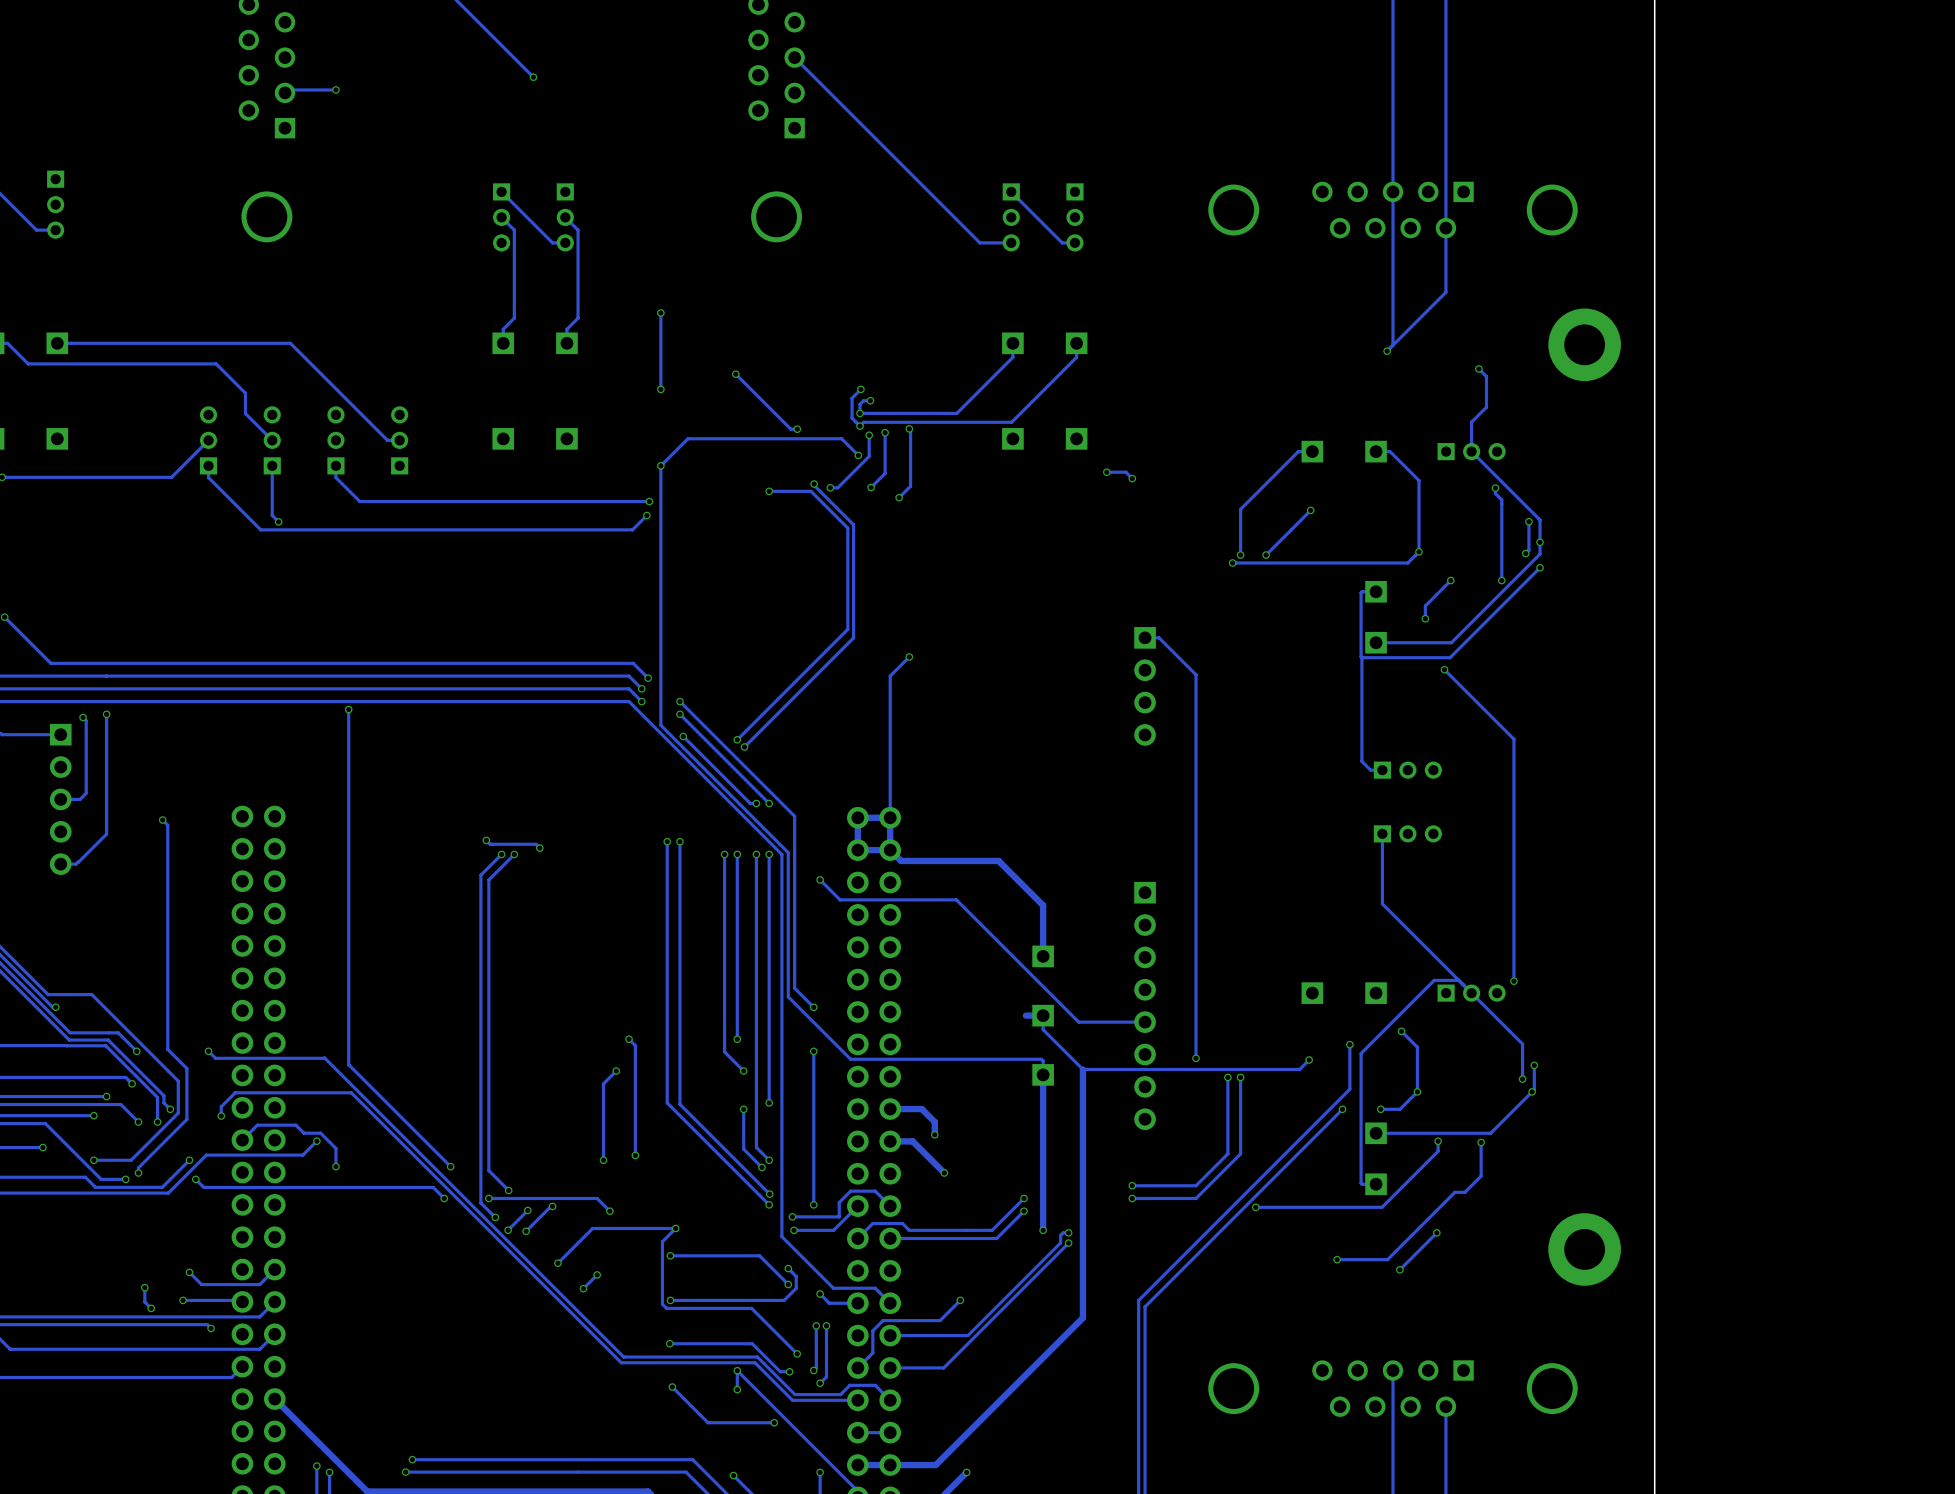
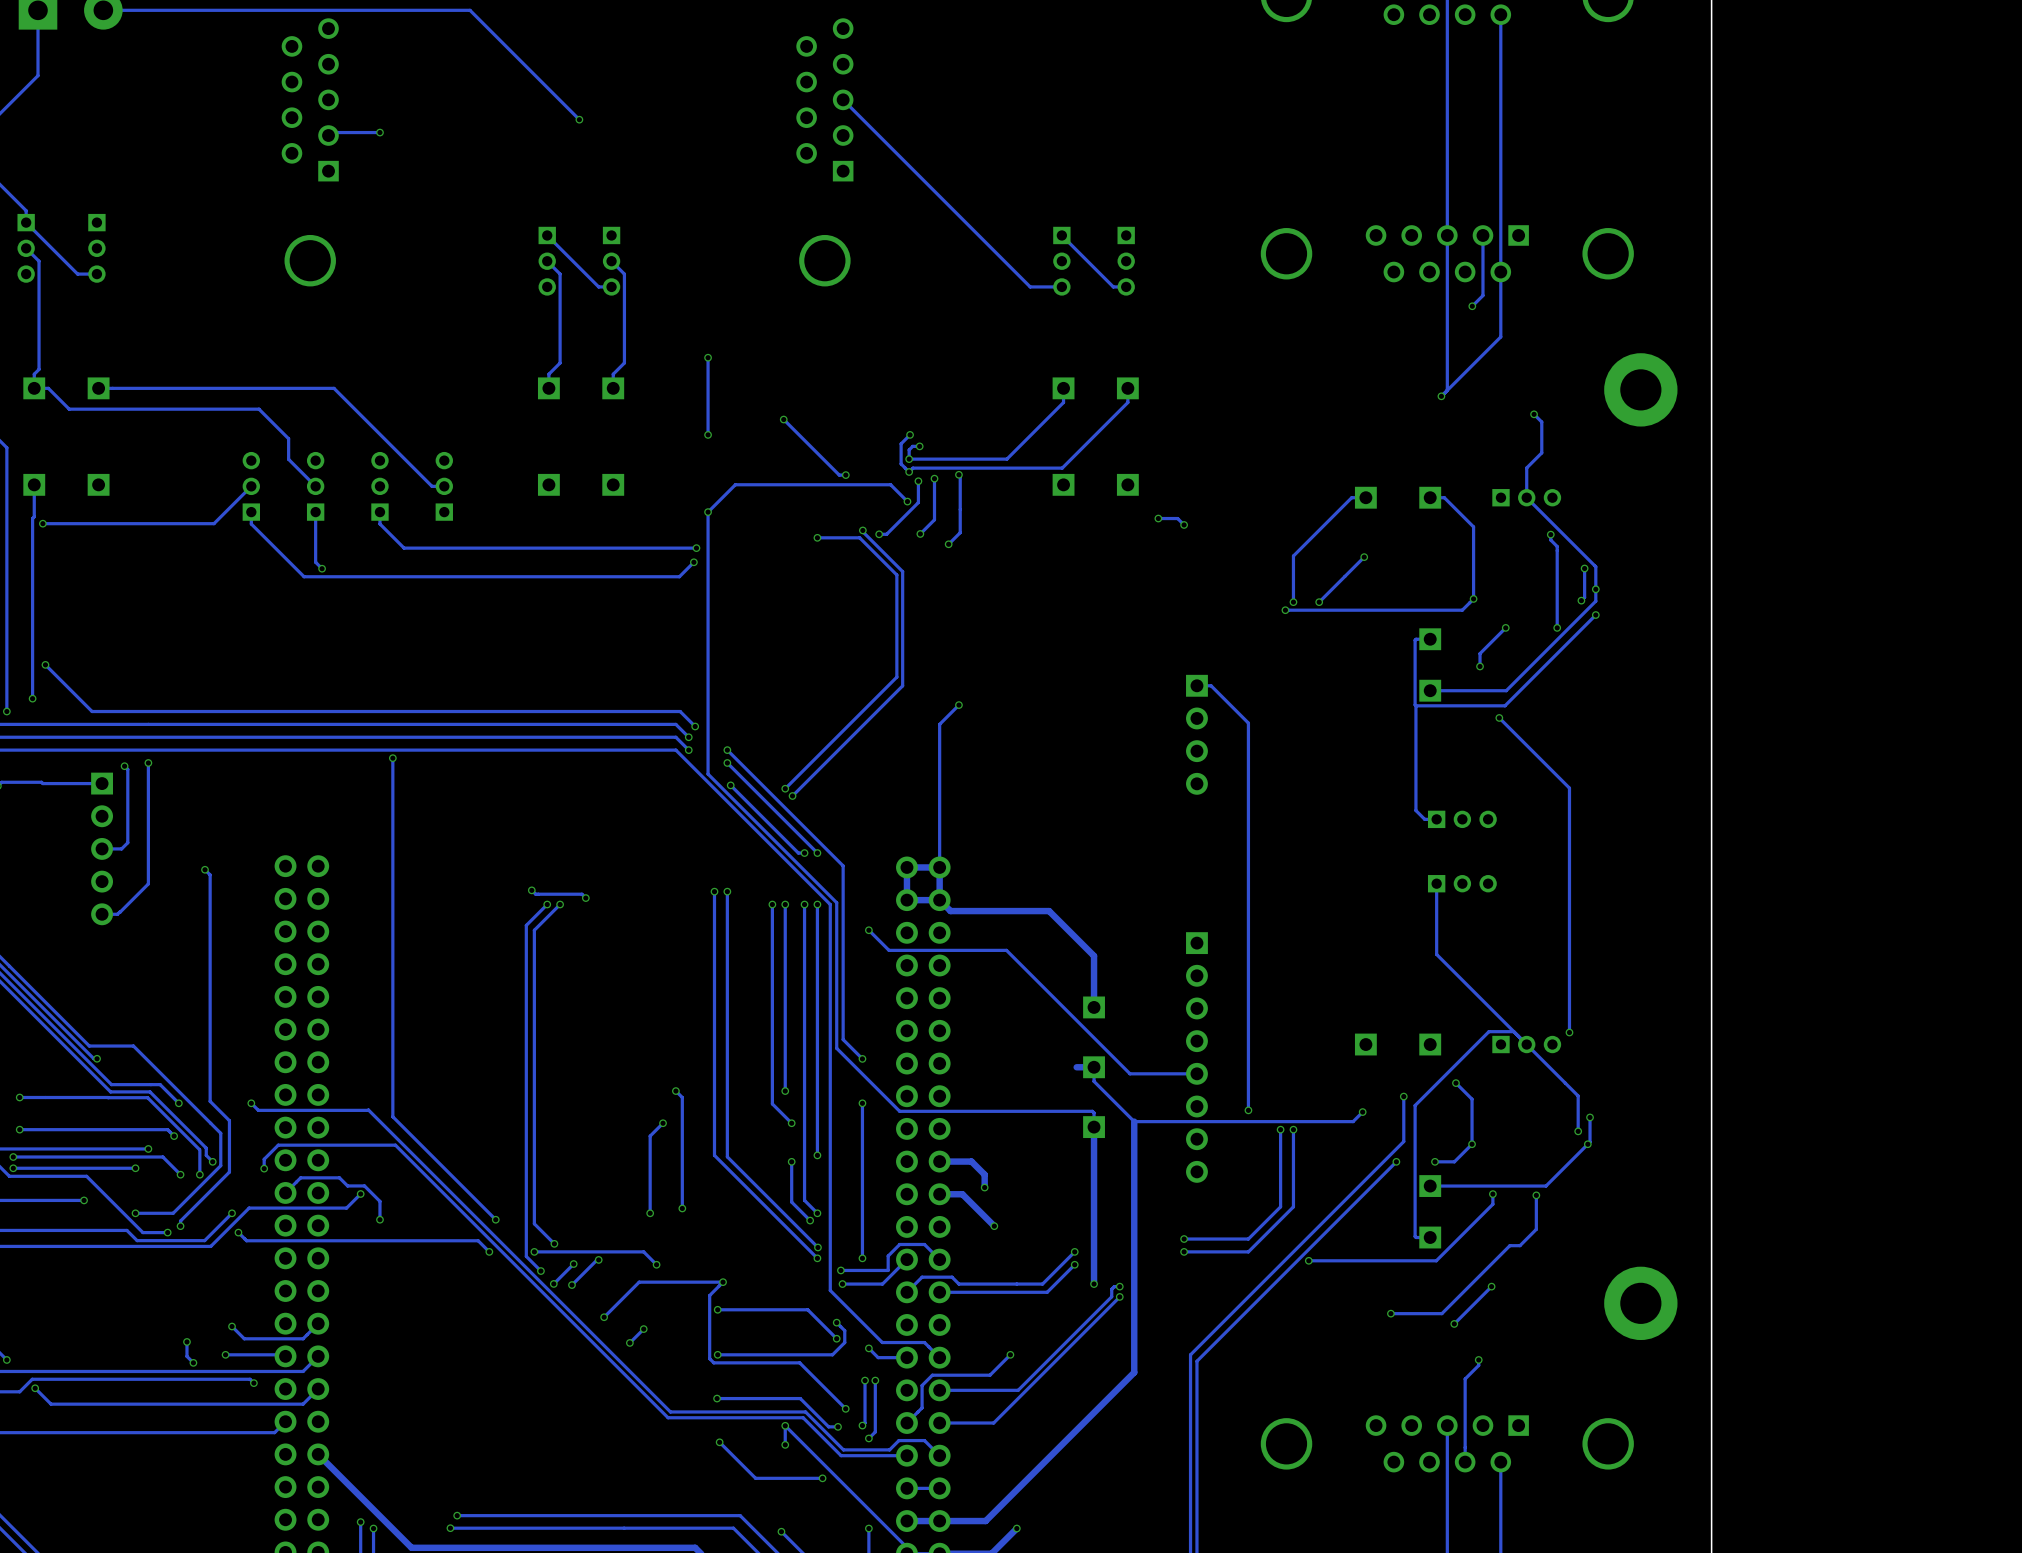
track: none -> (1482, 235) (1482, 295) (1472, 306)
via: none -> (1472, 306)
track: none -> (1478, 1359) (1478, 1365) (1465, 1379) (1465, 1462)
via: none -> (1478, 1359)

